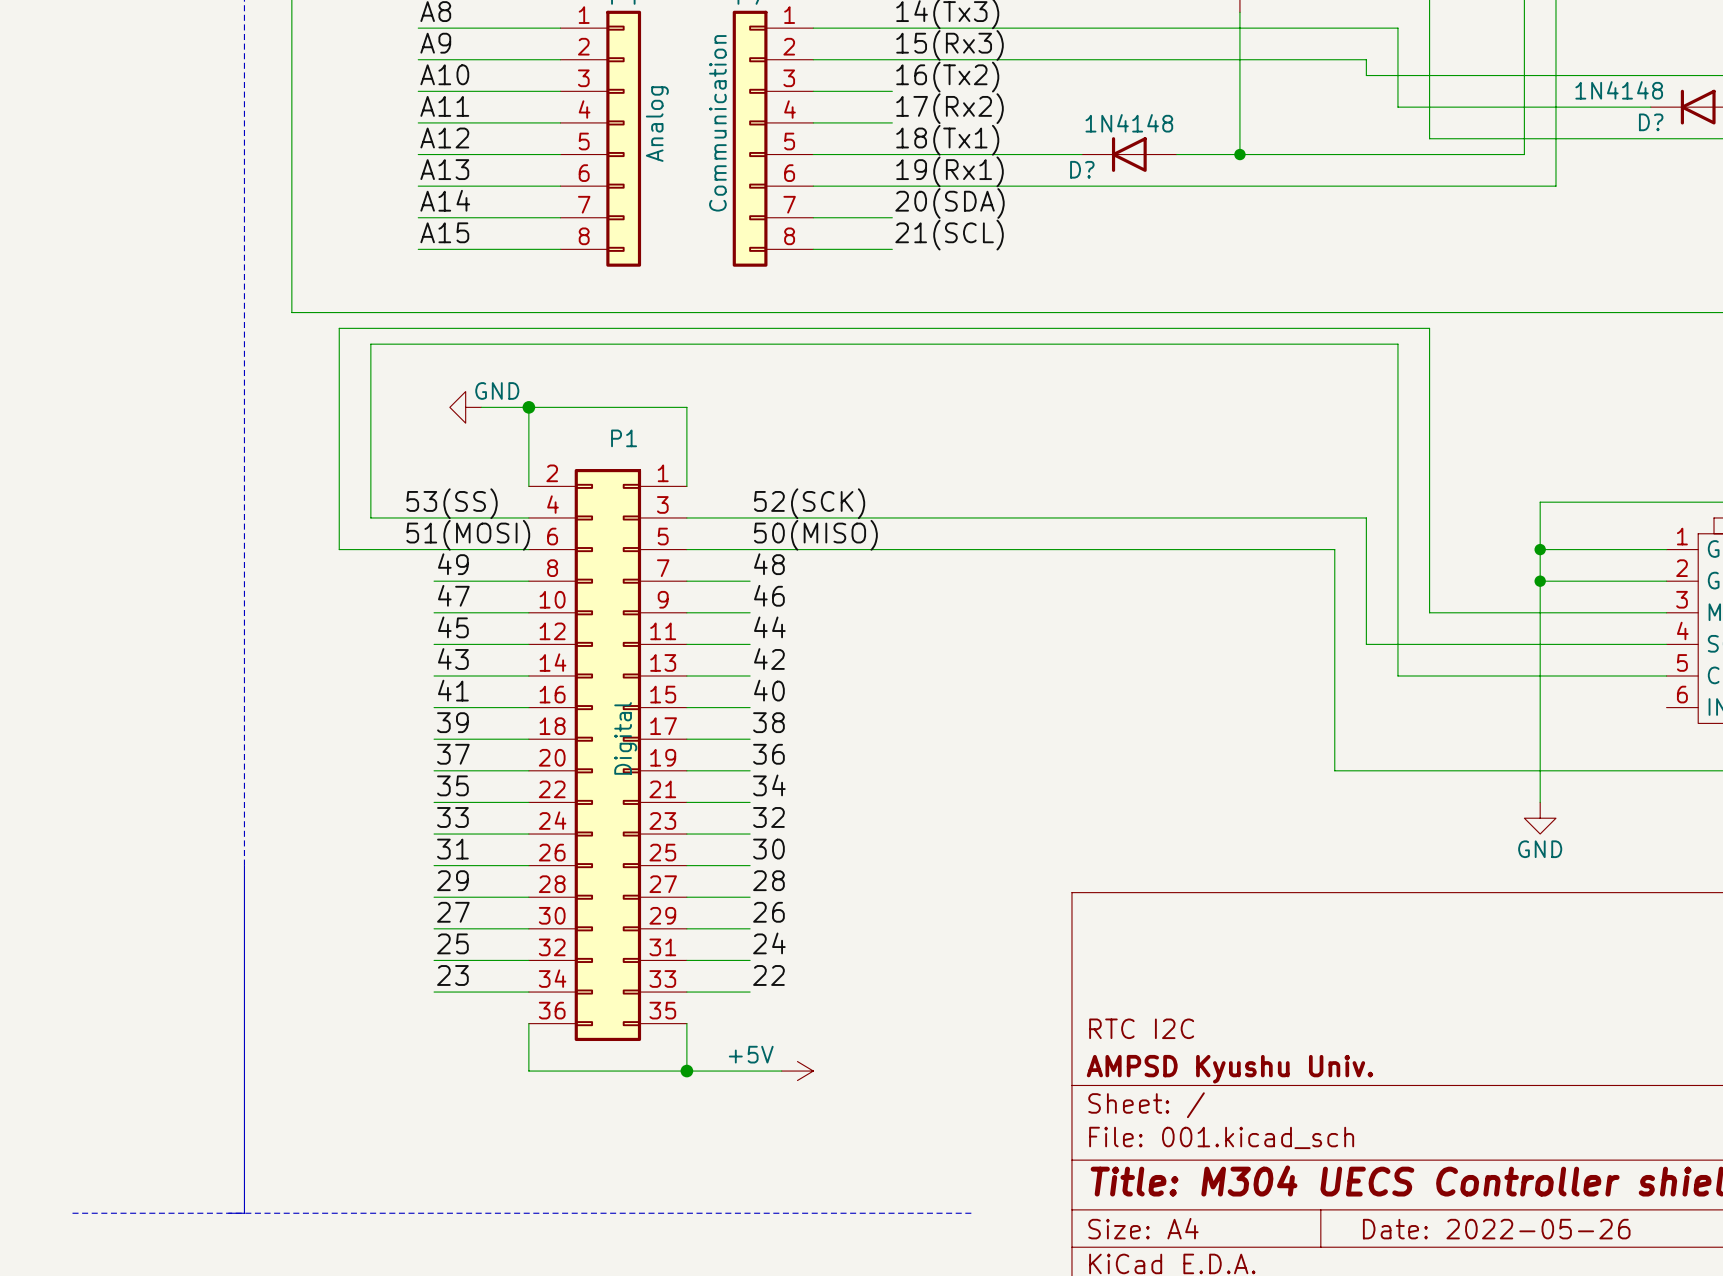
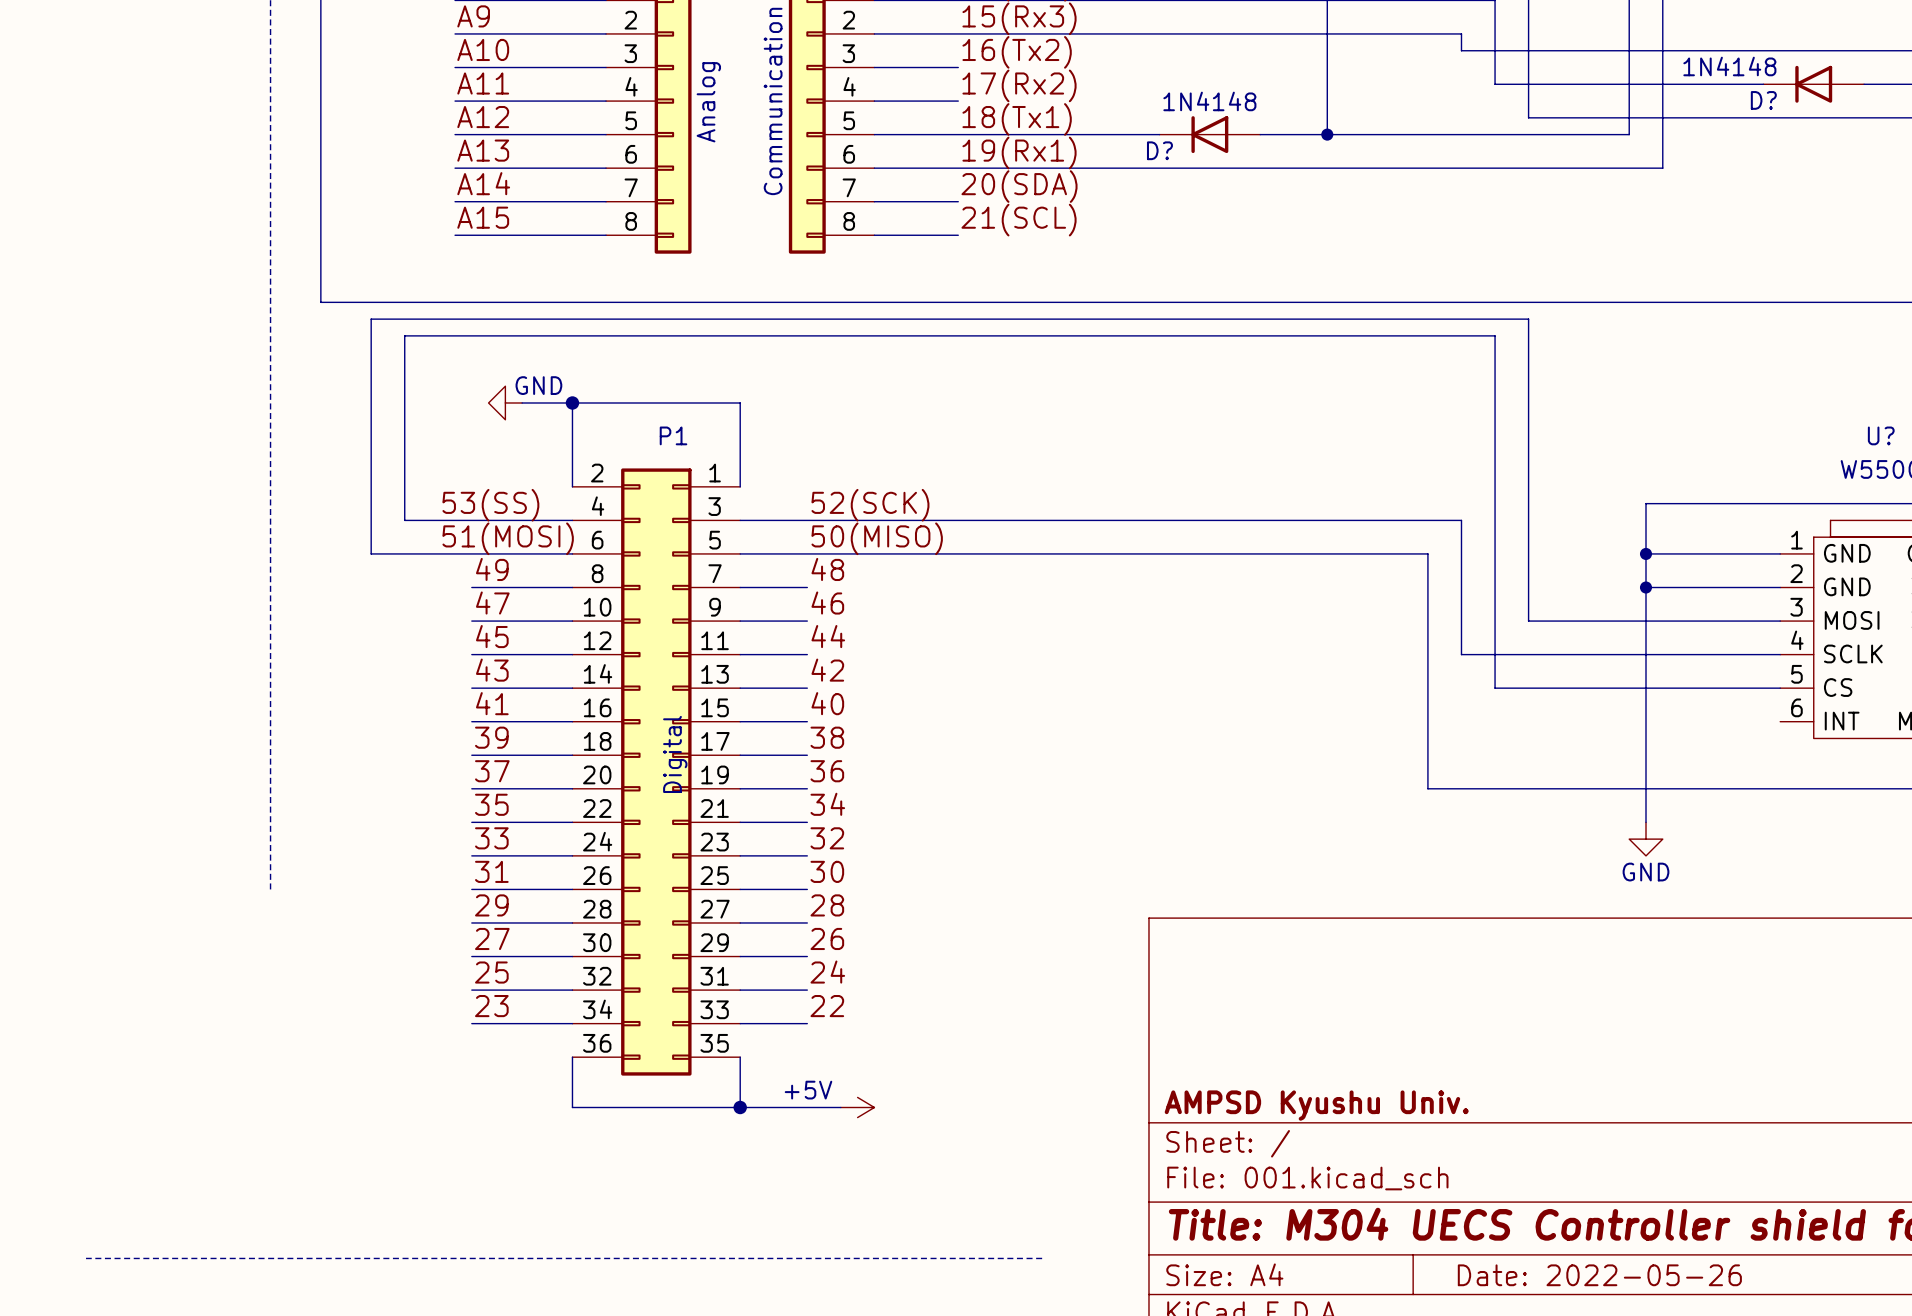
line: (244, 865) (244, 1213) (228, 1213) -> none
title block: RTC I2C (1141, 1028) -> none

